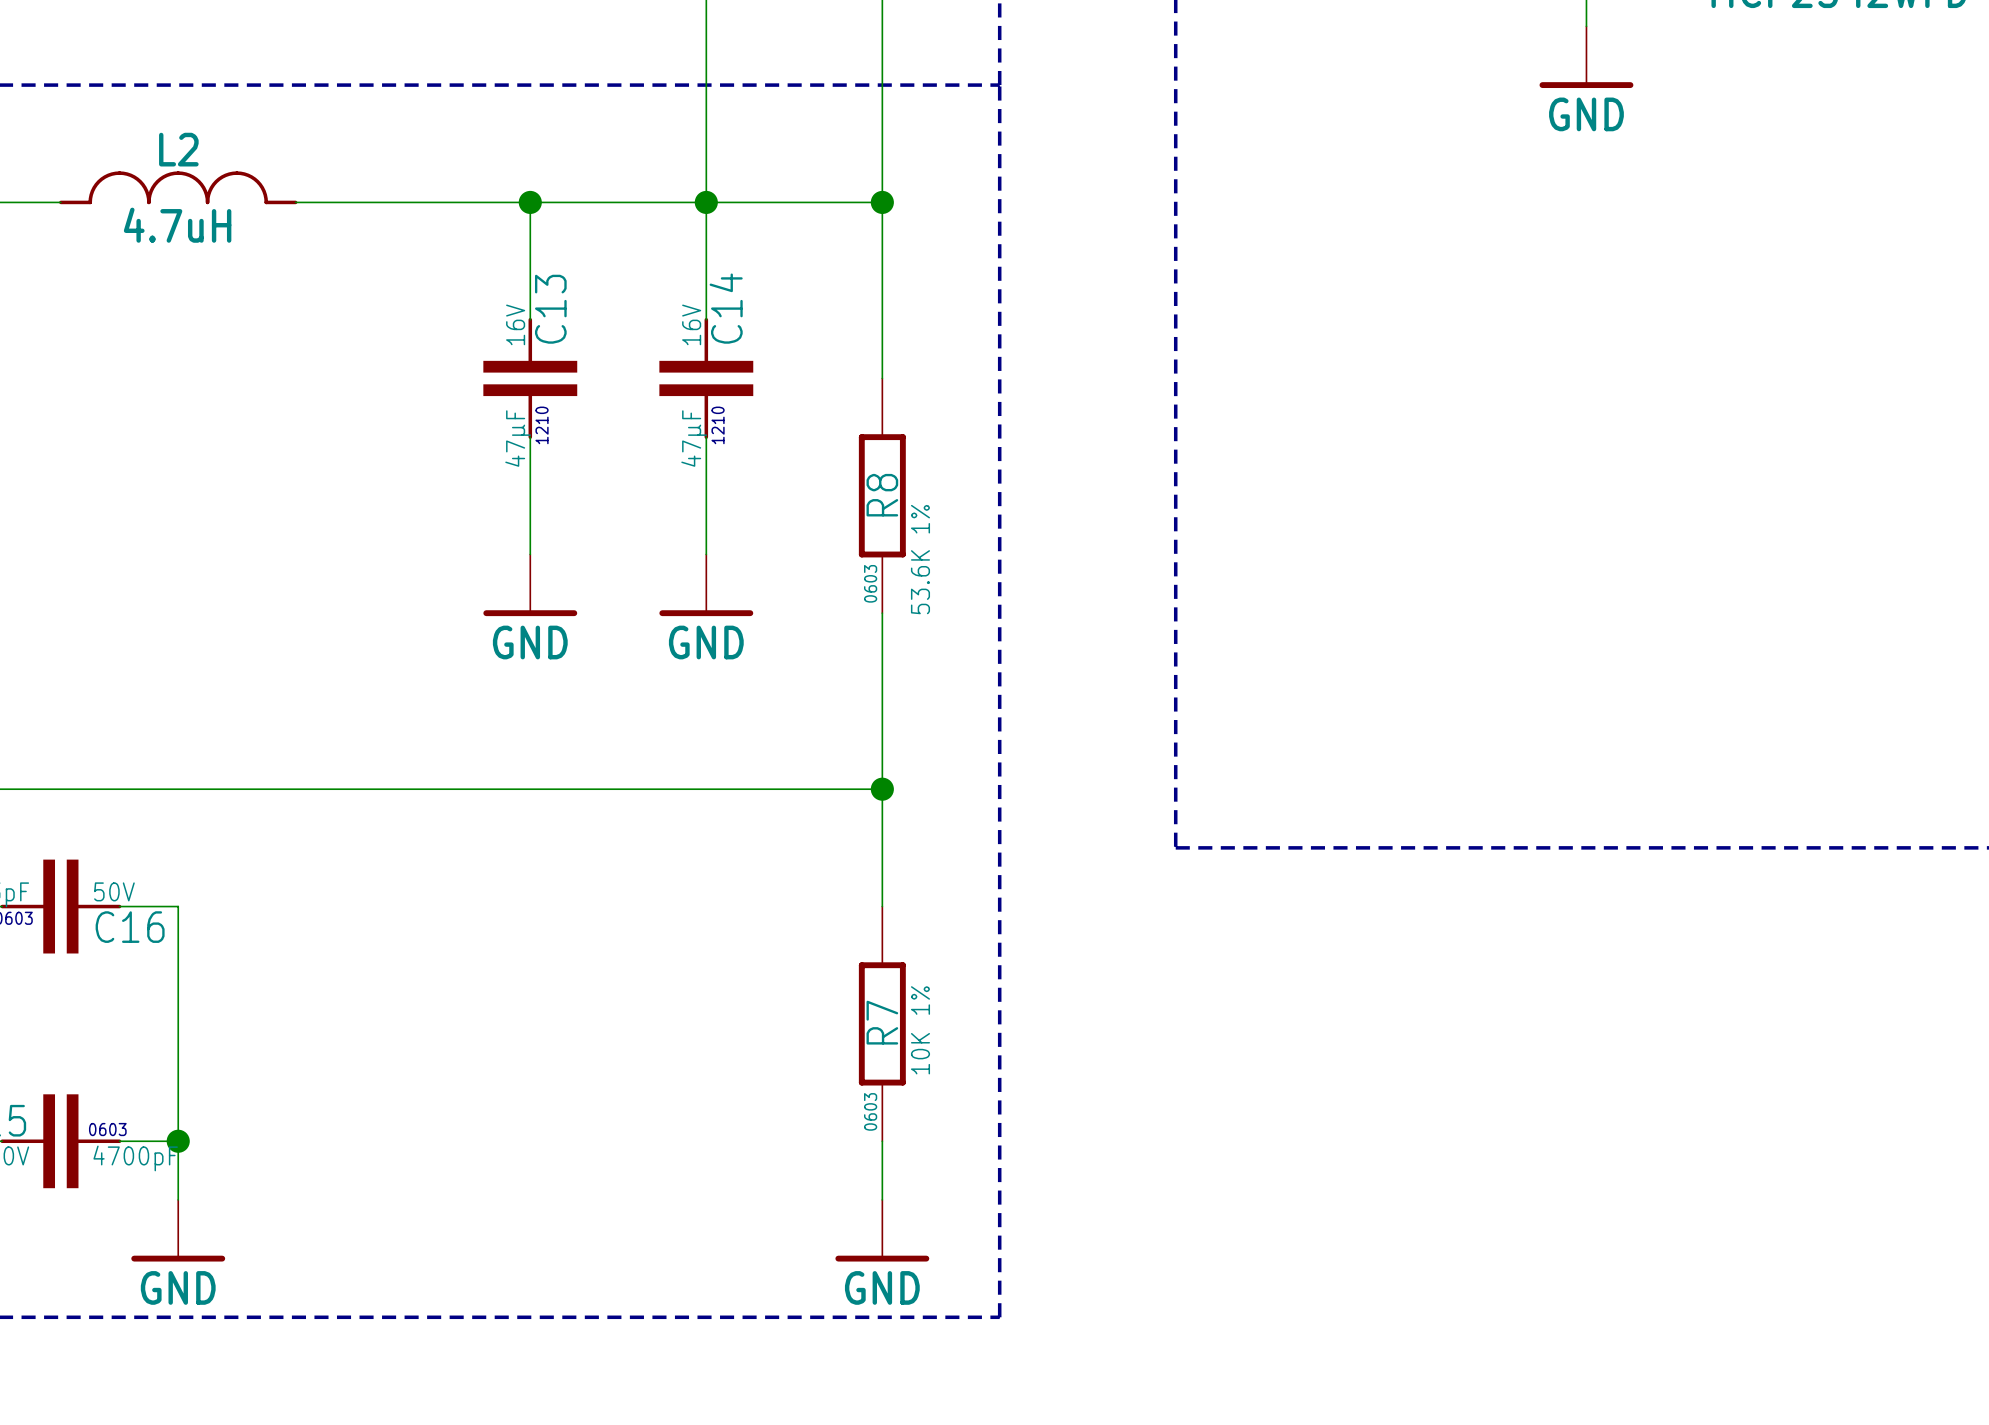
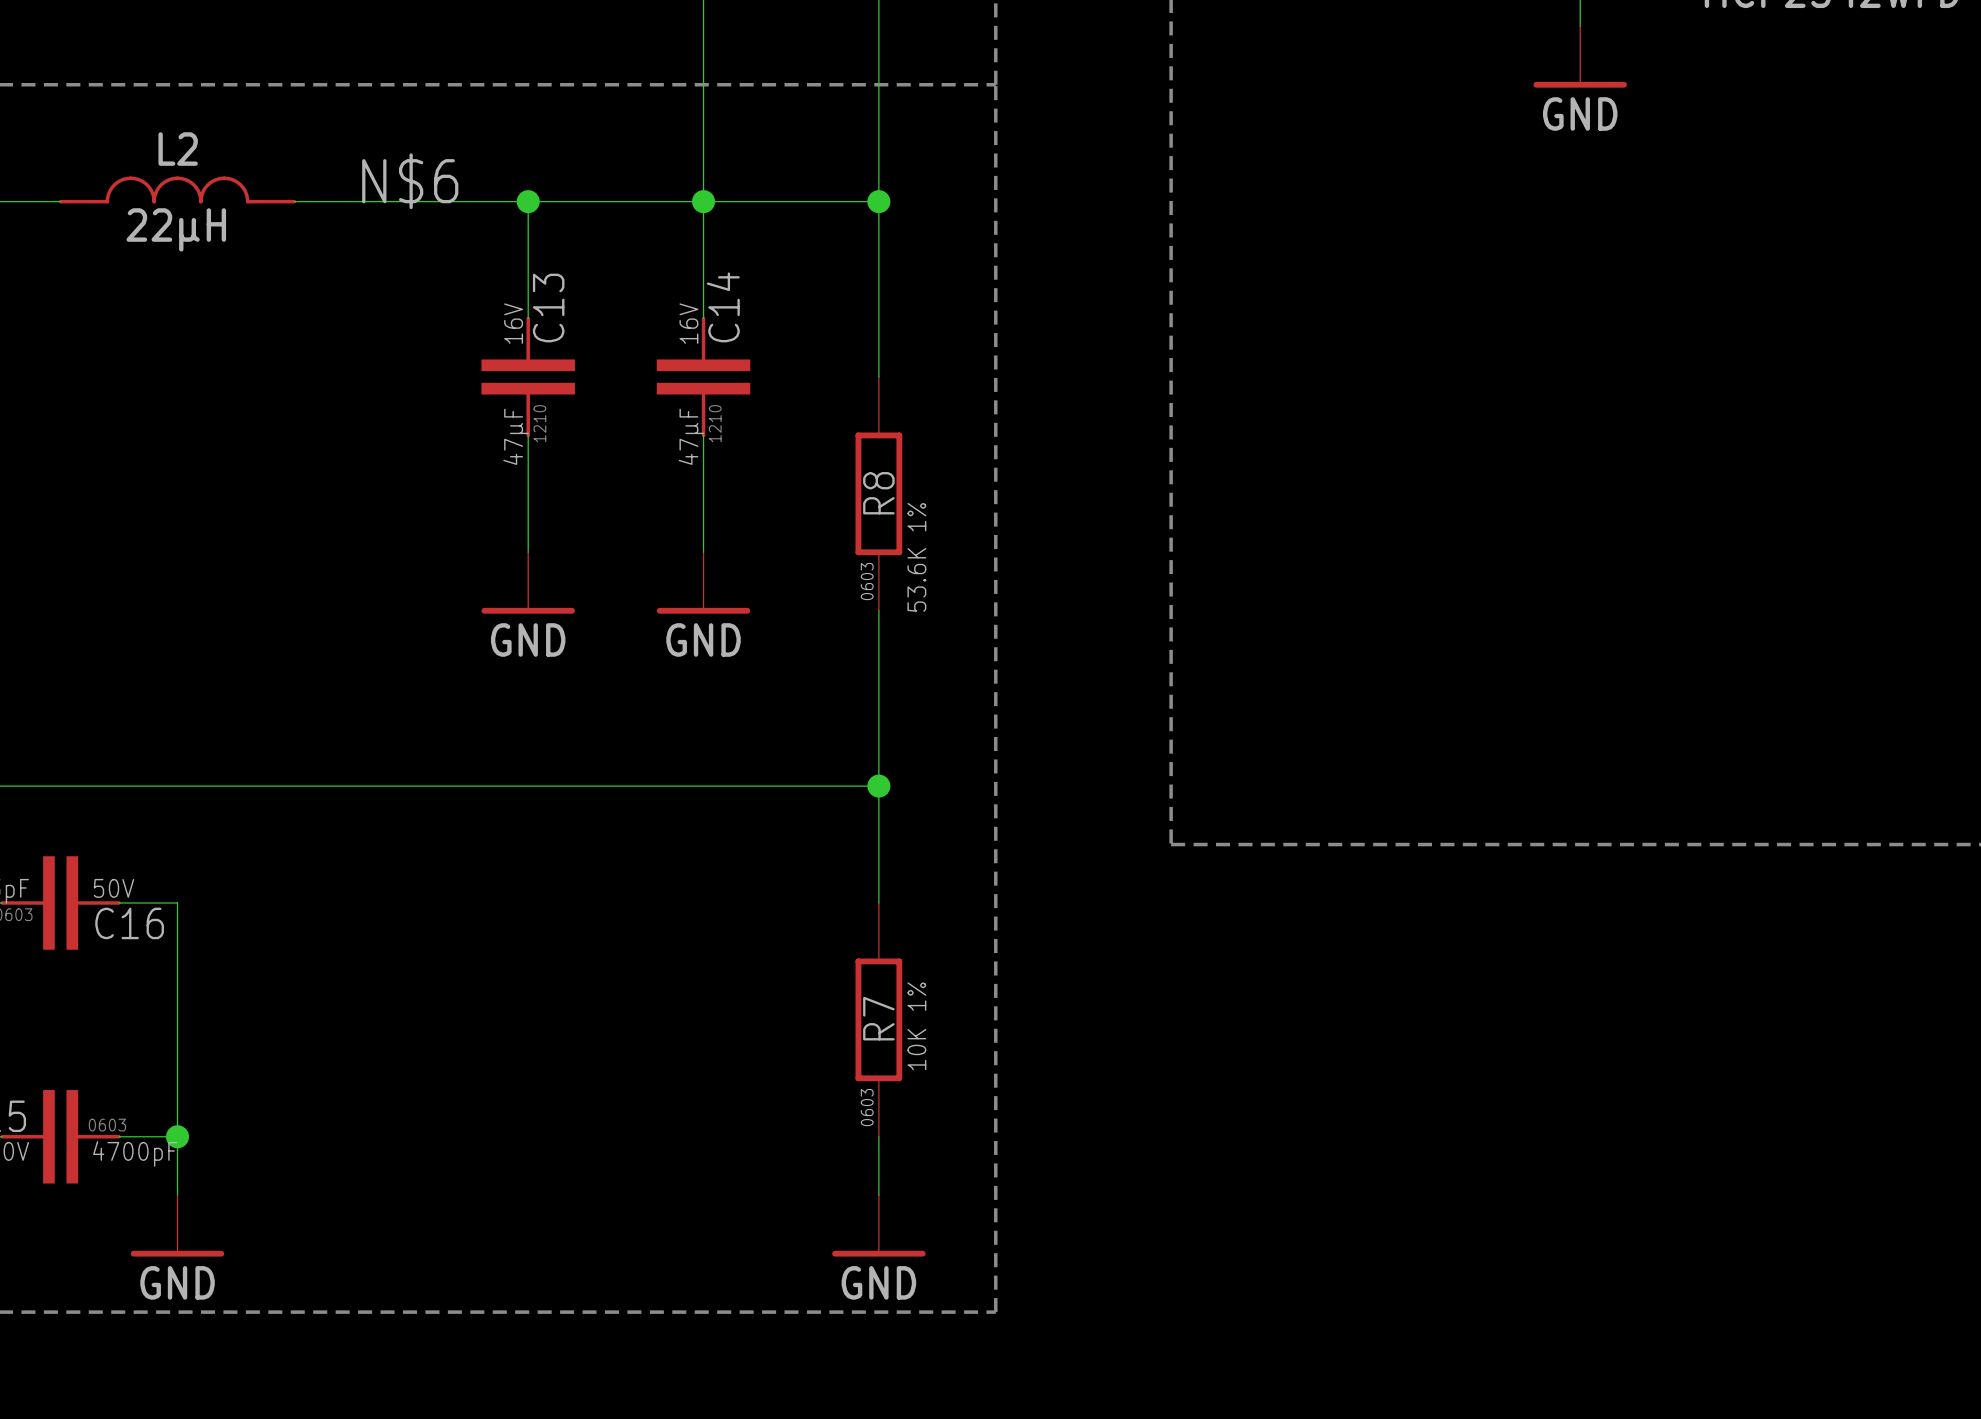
L2 symbol: [59, 171, 298, 205] -> [58, 176, 297, 204]
label: none -> N$6 (410, 181)
L2 value: 4.7uH (177, 225) -> 22µH (176, 229)

